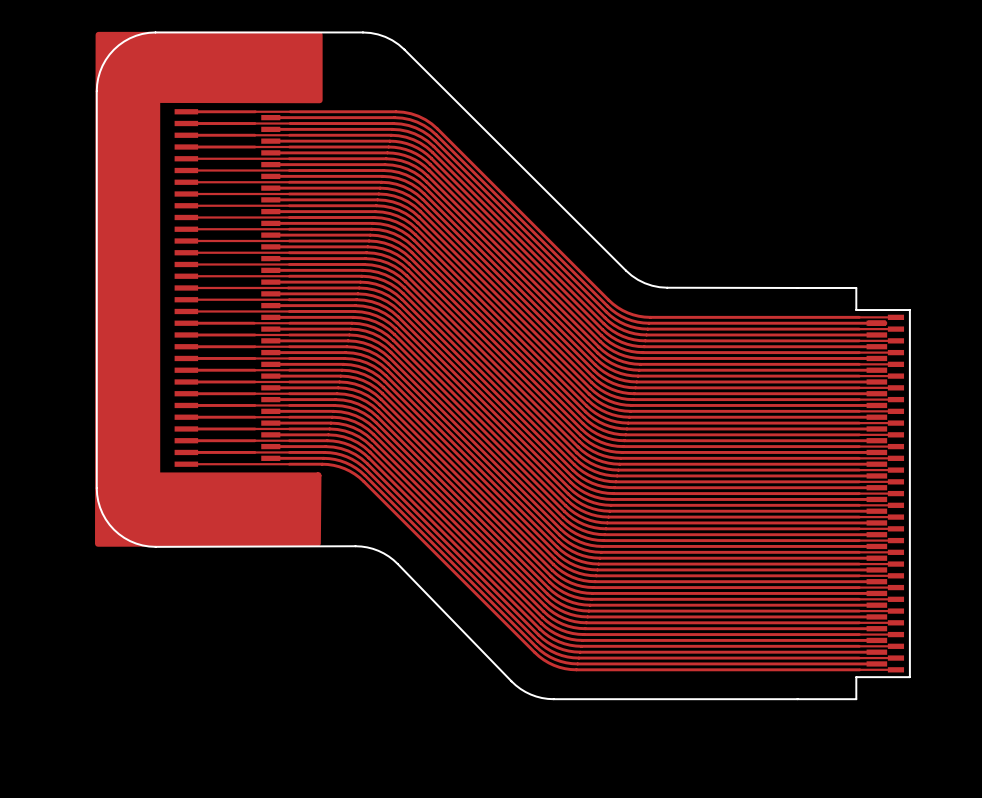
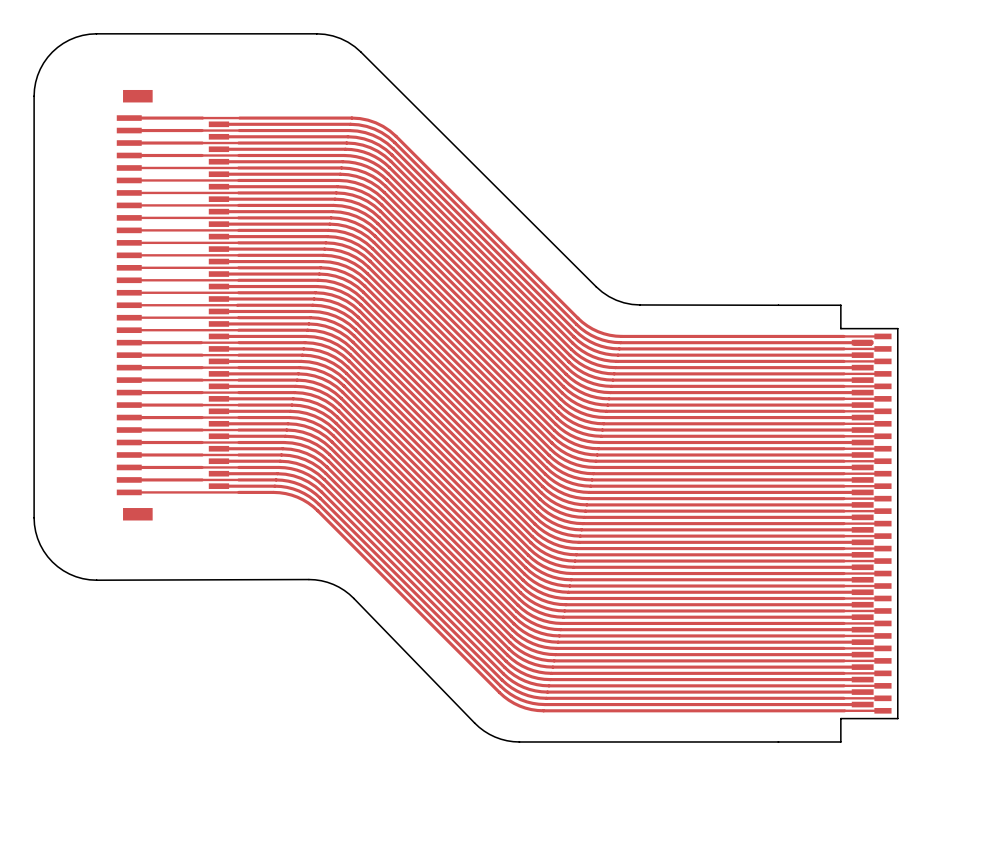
drawing: [95, 31, 323, 547] -> none

